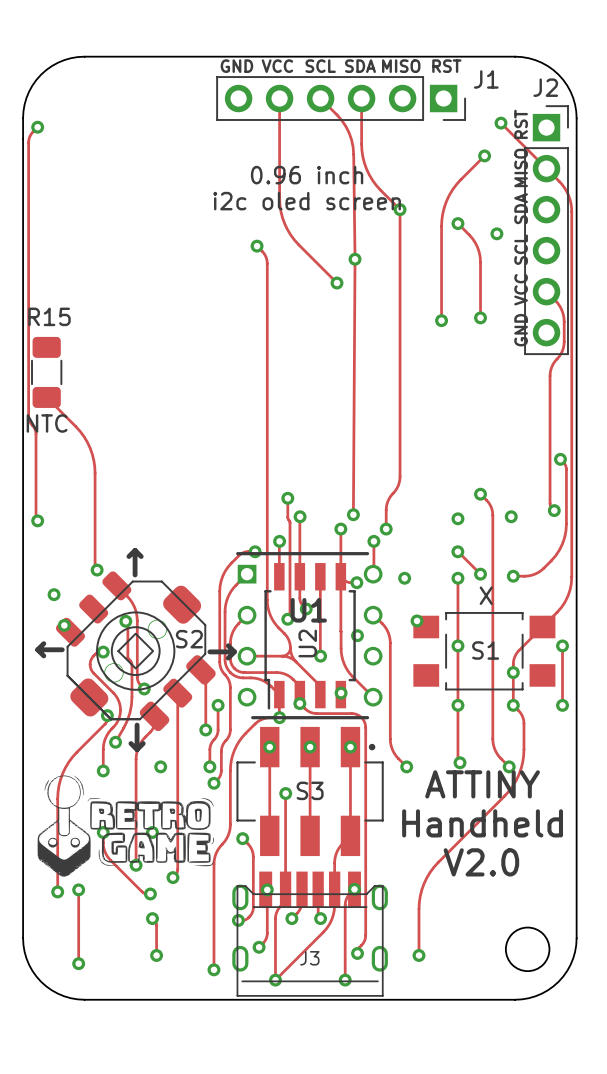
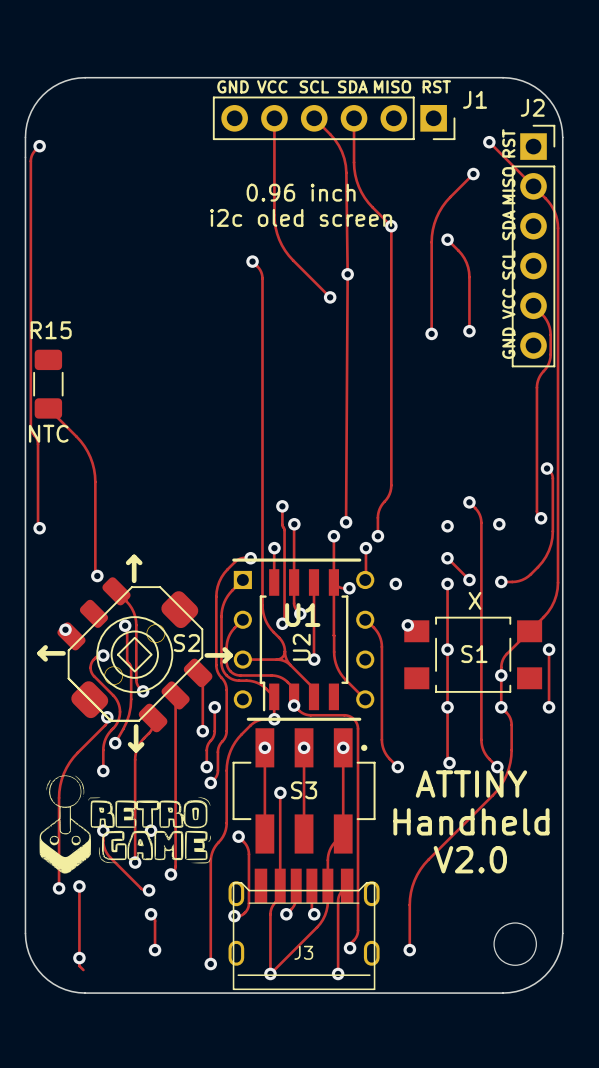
via: (496, 233) -> none
via: (54, 594) -> none
via: (357, 635) -> none
via: (341, 693) -> none
via: (160, 766) -> none
track: (267, 889) (267, 935) (259, 947) -> none
via: (267, 889) -> none
via: (354, 889) -> none
via: (259, 947) -> none
track: none -> (79, 958) (79, 966) (83, 970)

